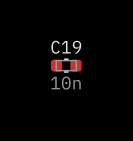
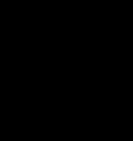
C19: 10n (66, 65) -> none

